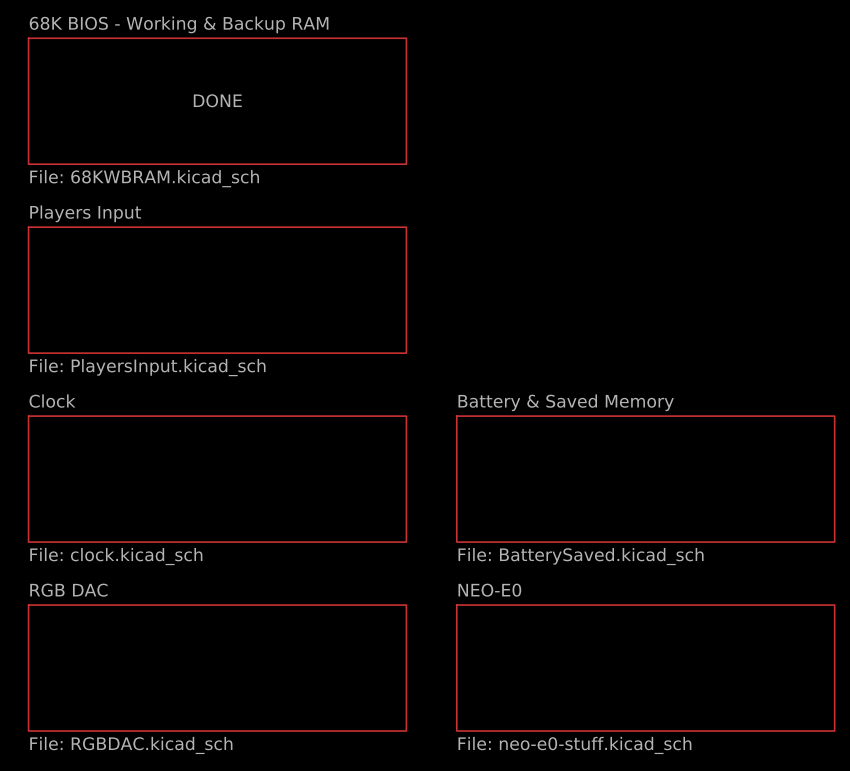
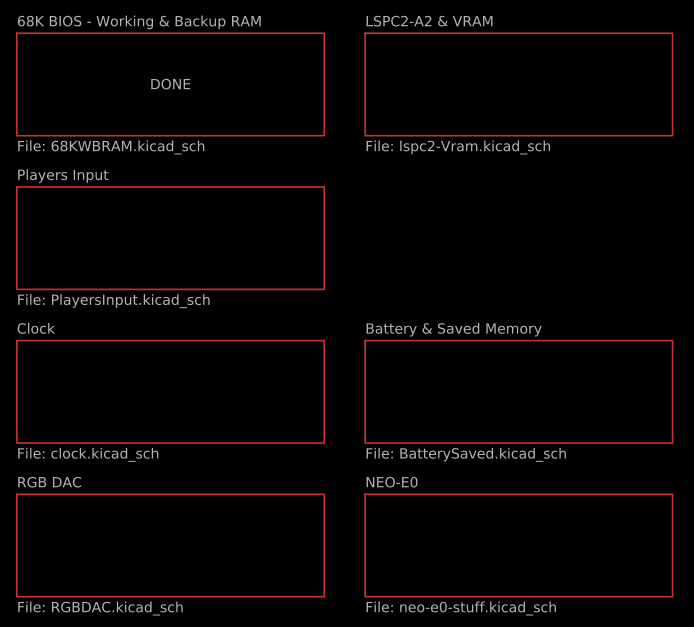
sheet LSPC2-A2 & VRAM: none -> File: lspc2-Vram.kicad_sch (518, 84)

